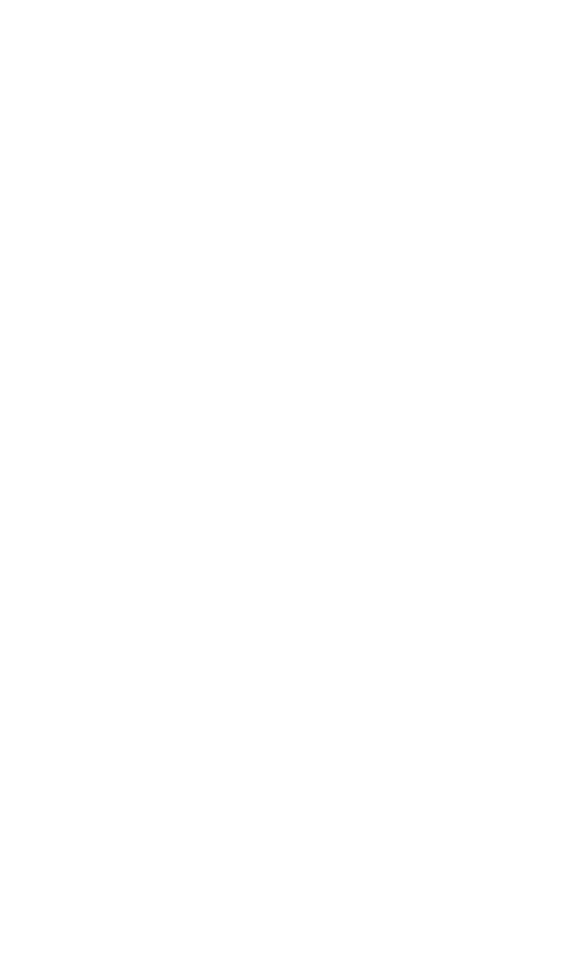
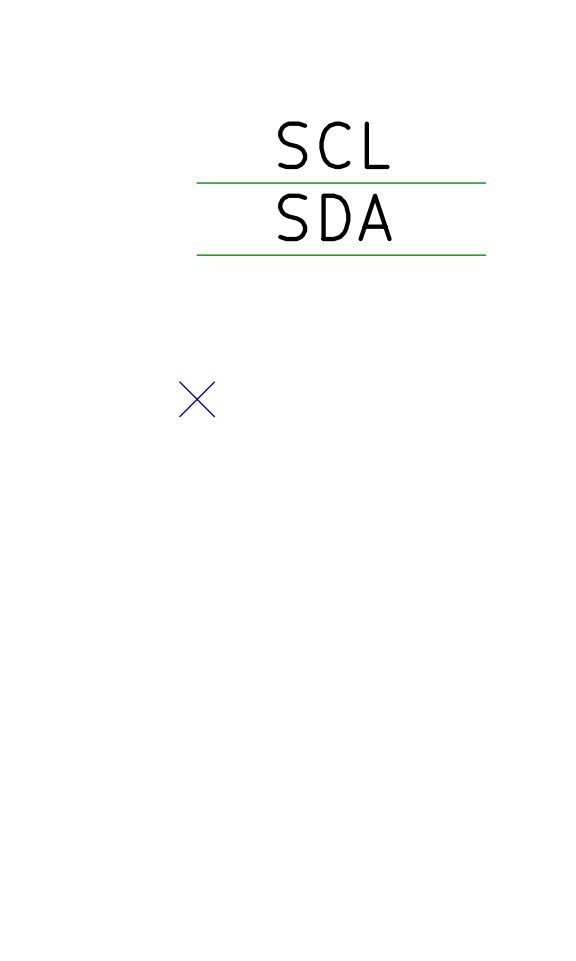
label: none -> SCL (333, 145)
wire: none -> (197, 183) (485, 183)
label: none -> SDA (334, 217)
wire: none -> (197, 255) (485, 255)
no-connect mark: none -> (197, 399)

